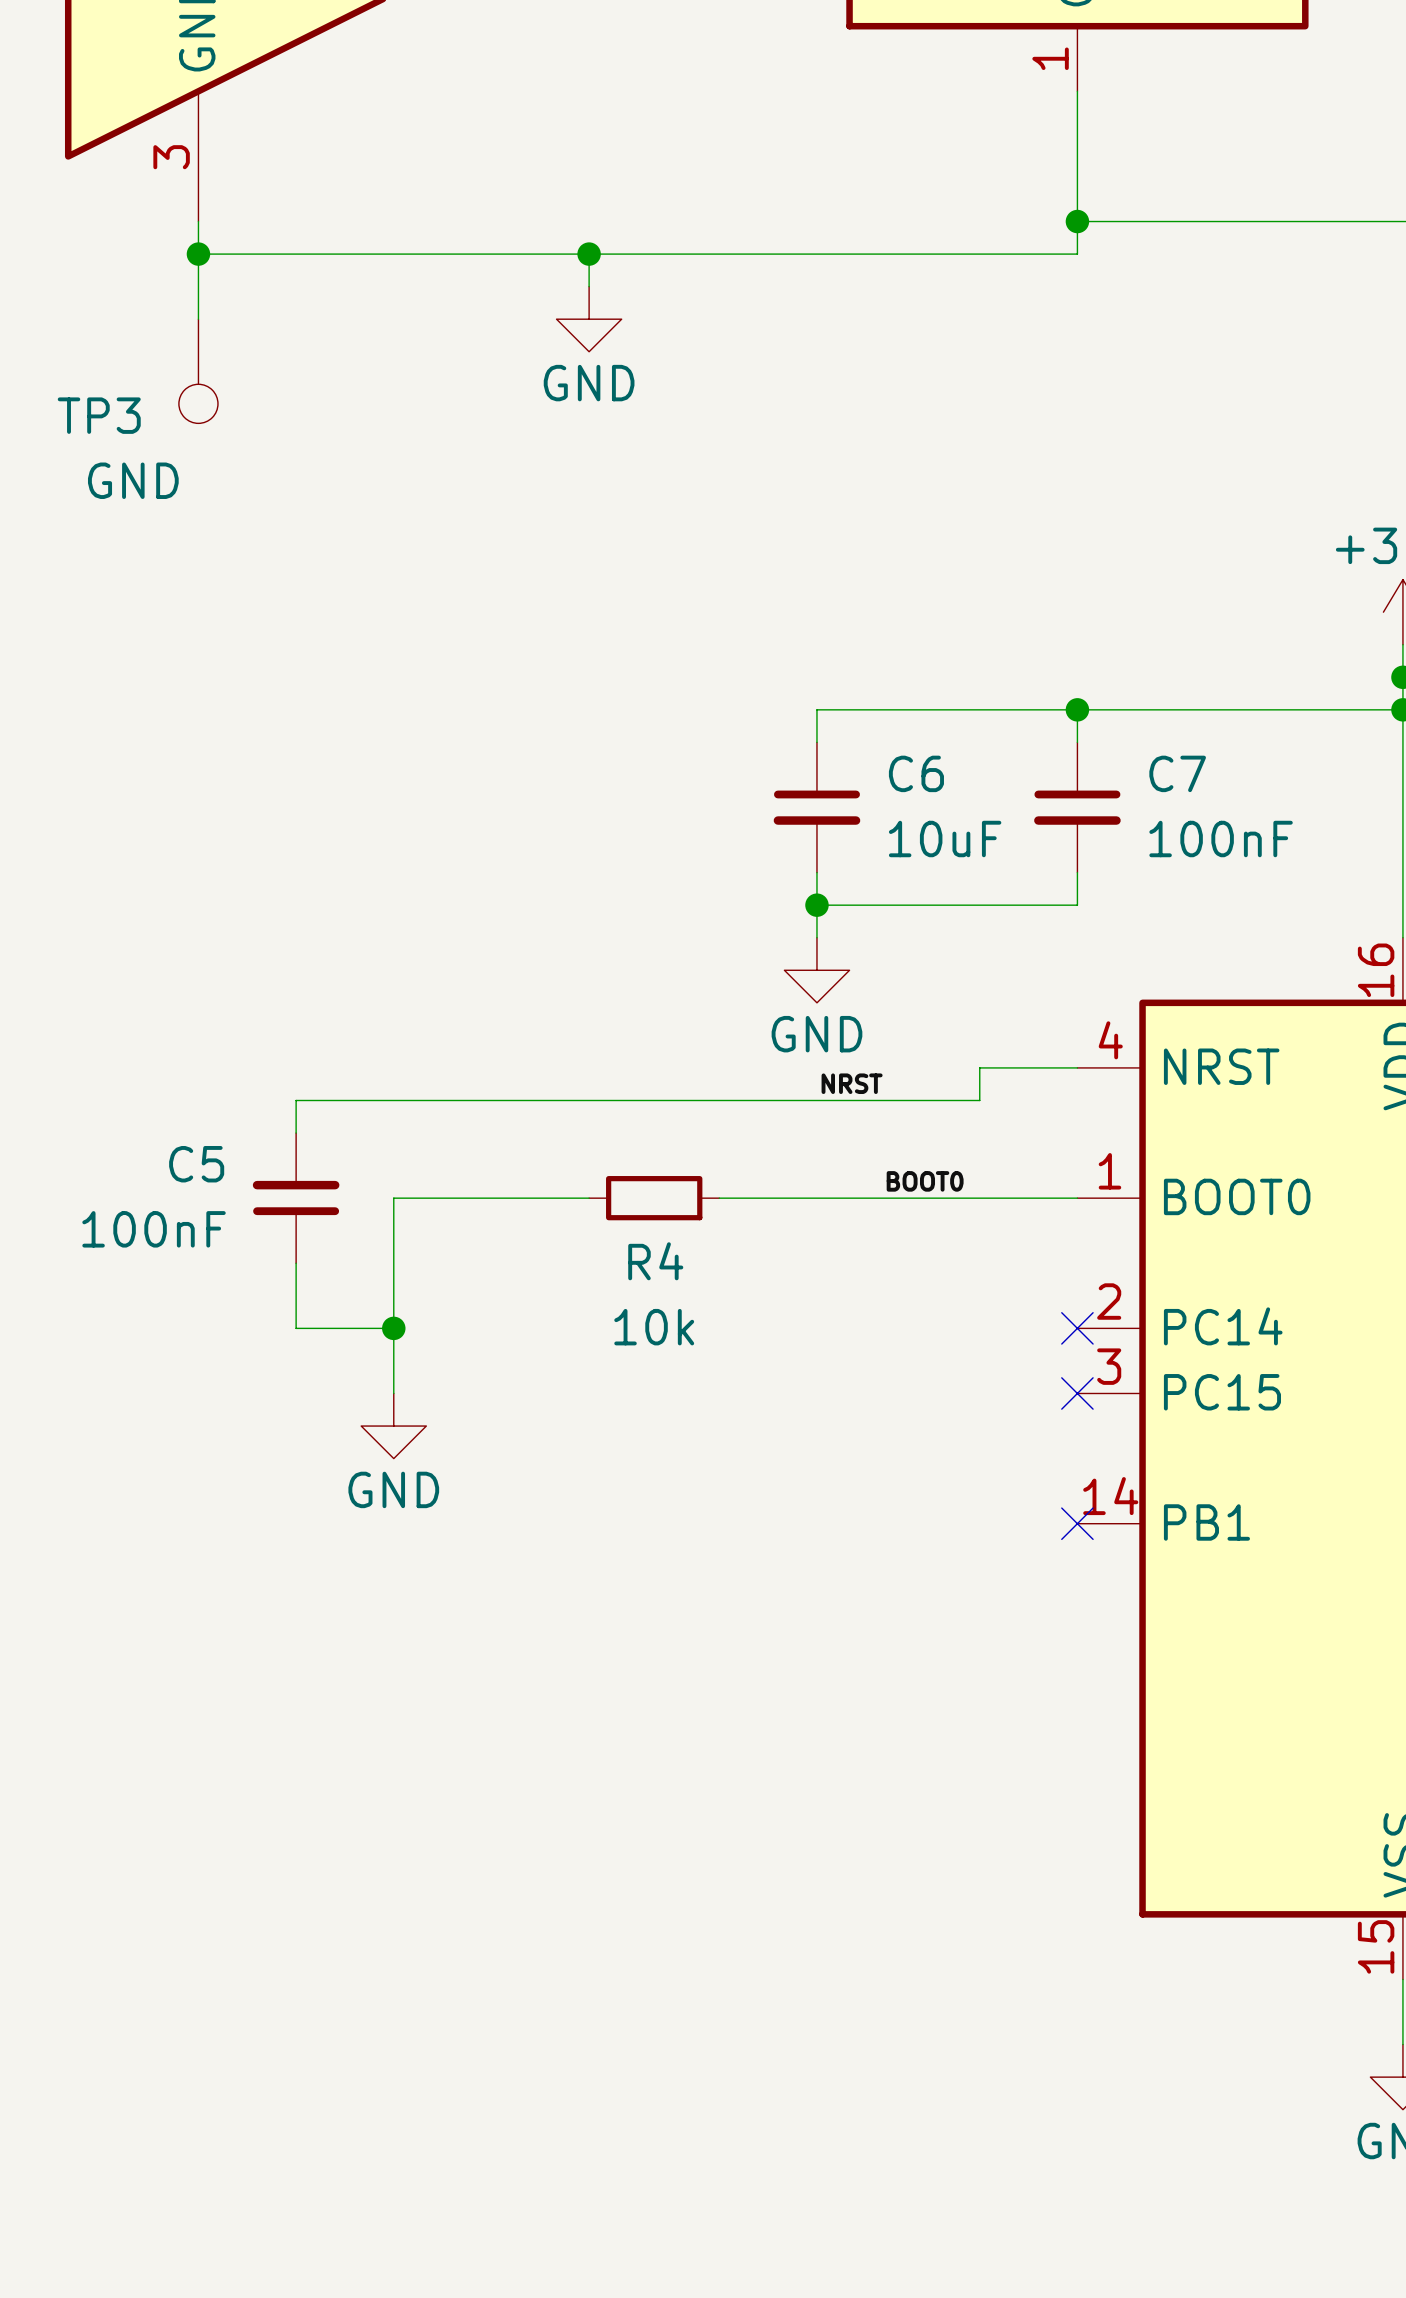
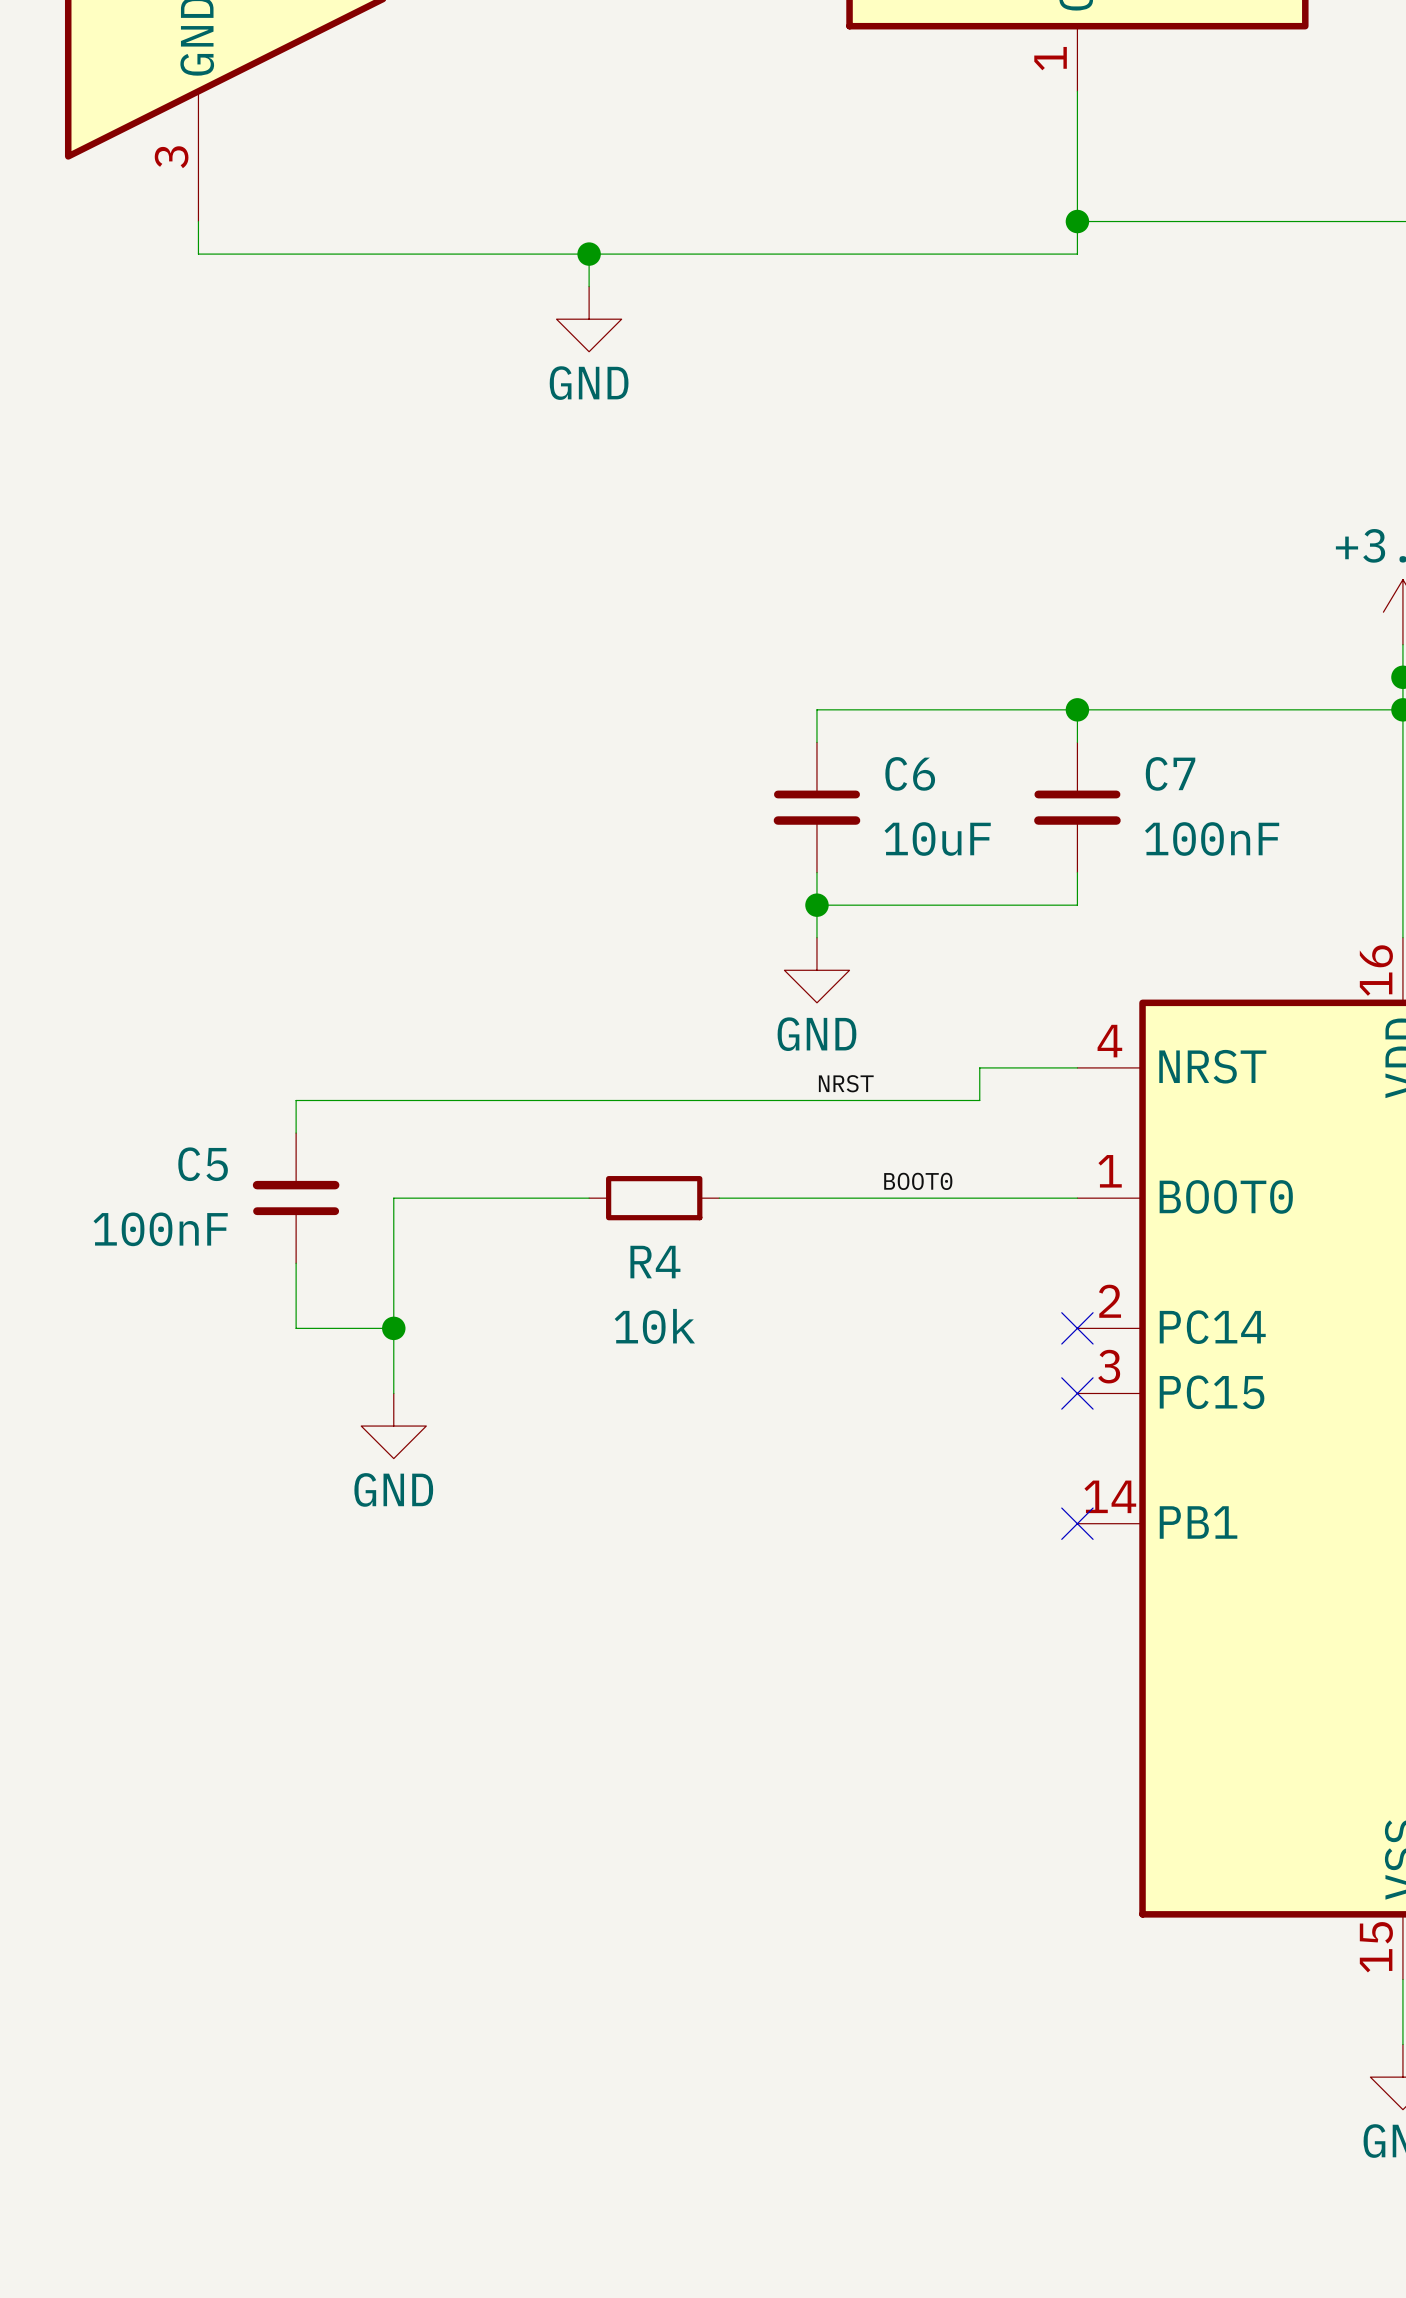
wire: (198, 254) (198, 319) -> none
junction: (198, 254) -> none
TP3: GND (198, 371) -> none

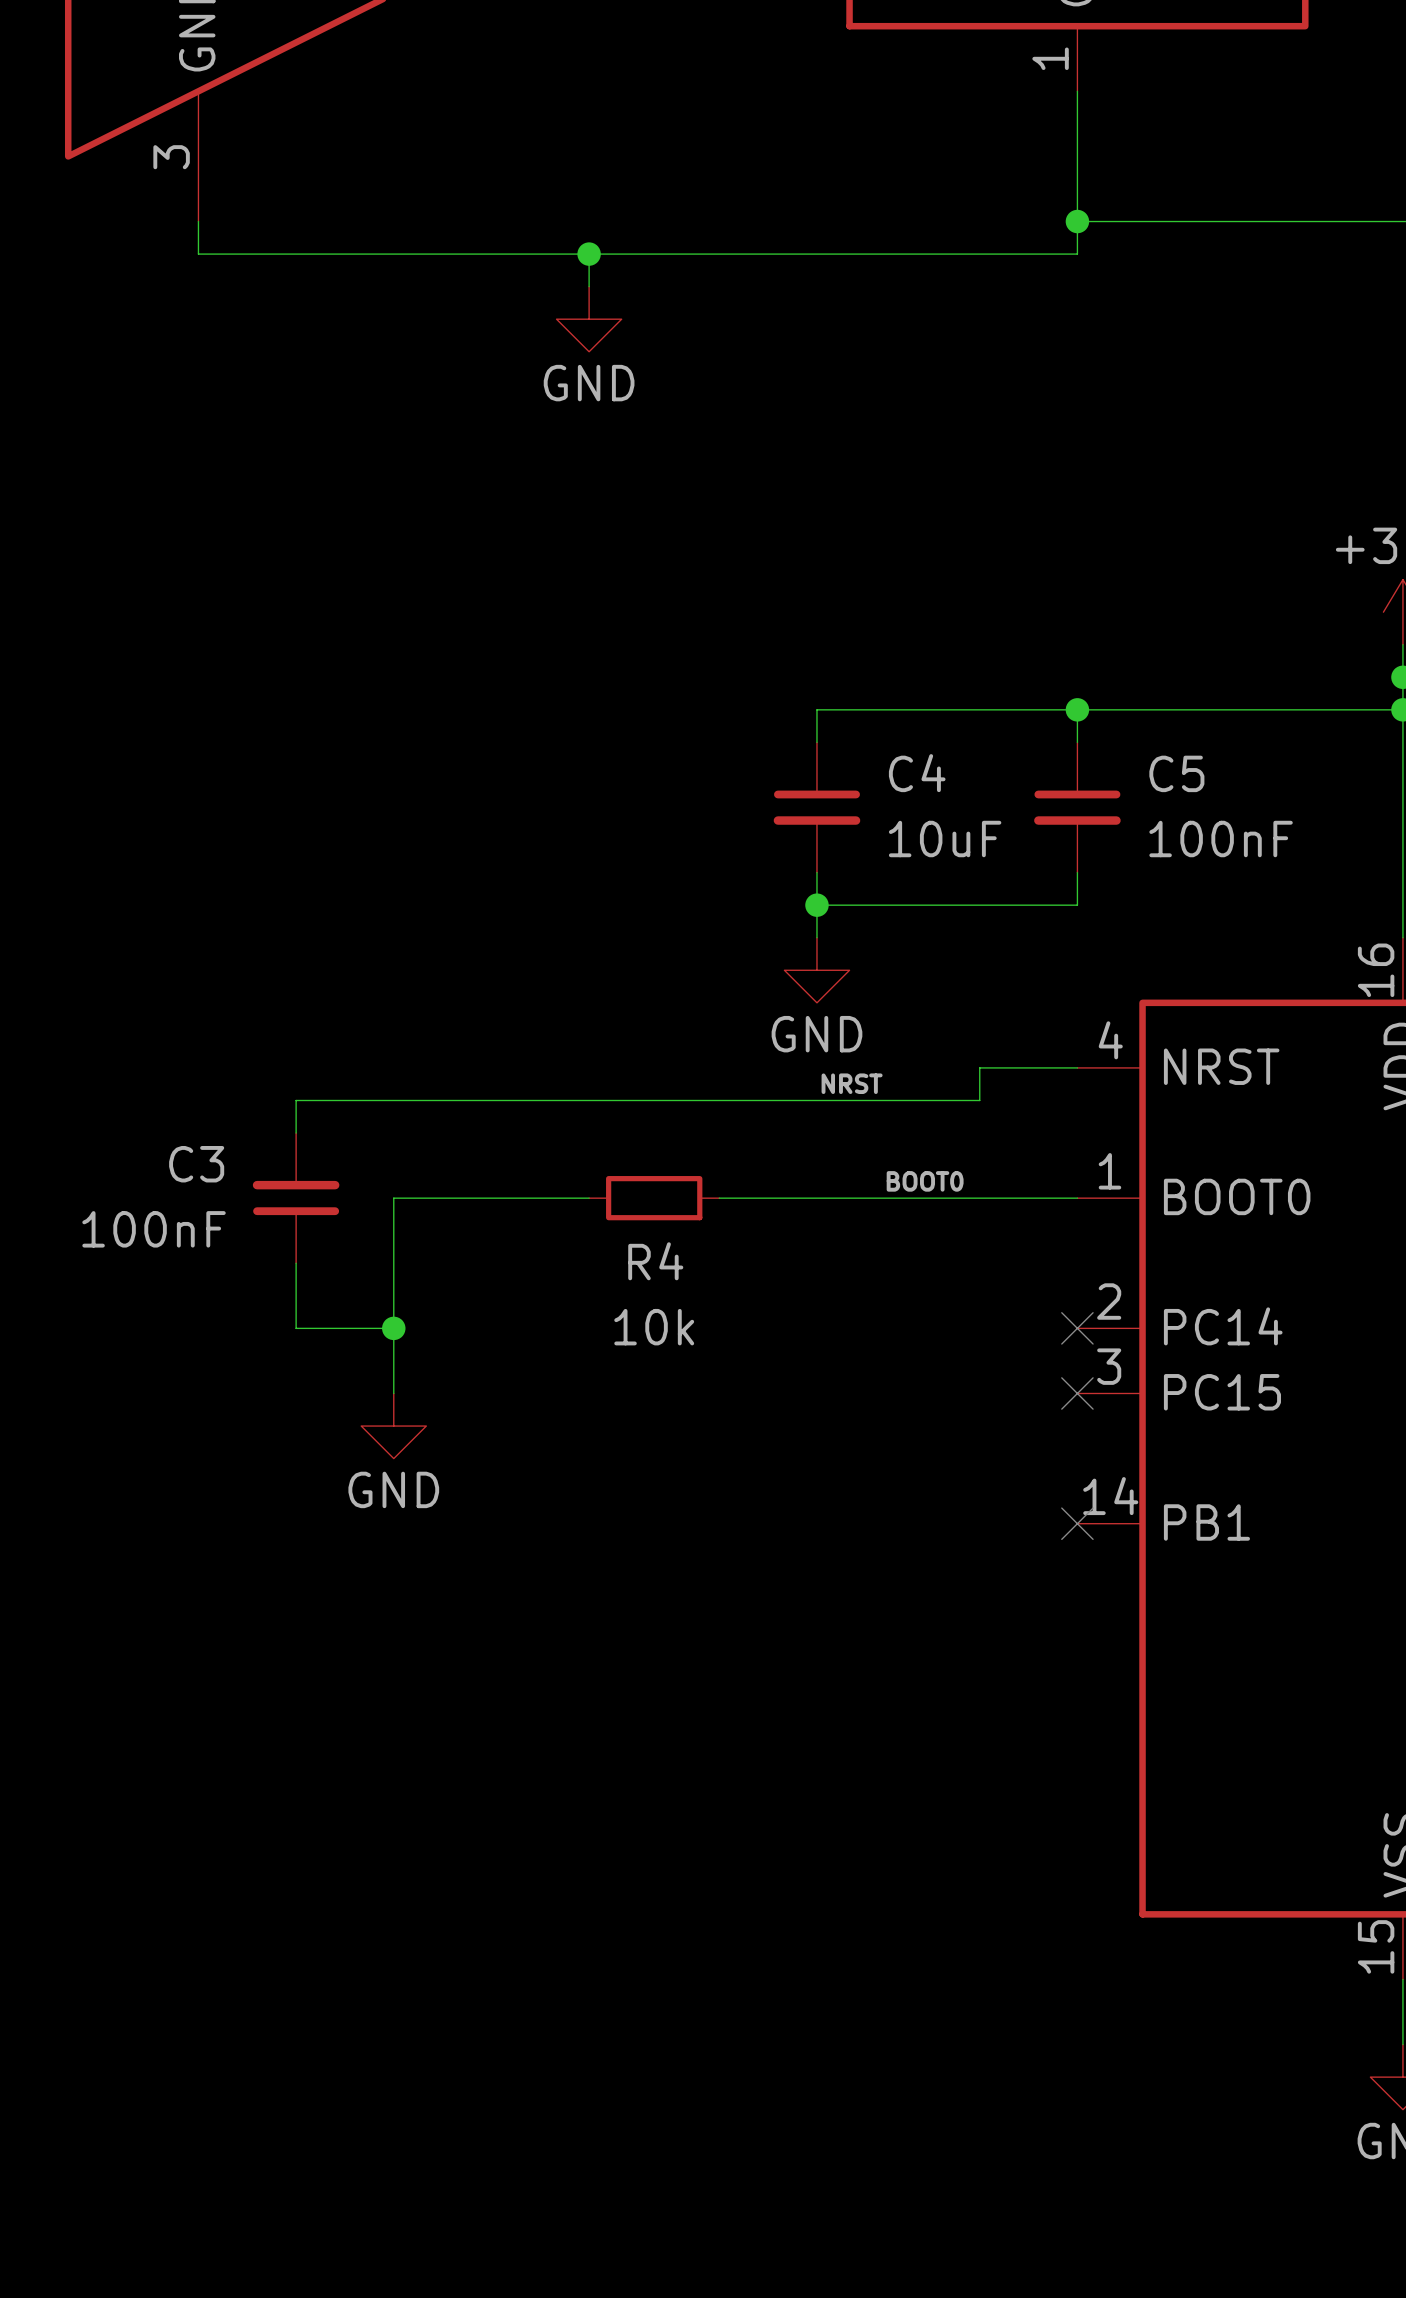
C6 name: C6 (910, 773) -> C4 (917, 773)
C7 name: C7 (1170, 773) -> C5 (1176, 773)
C5 name: C5 (203, 1164) -> C3 (196, 1164)

